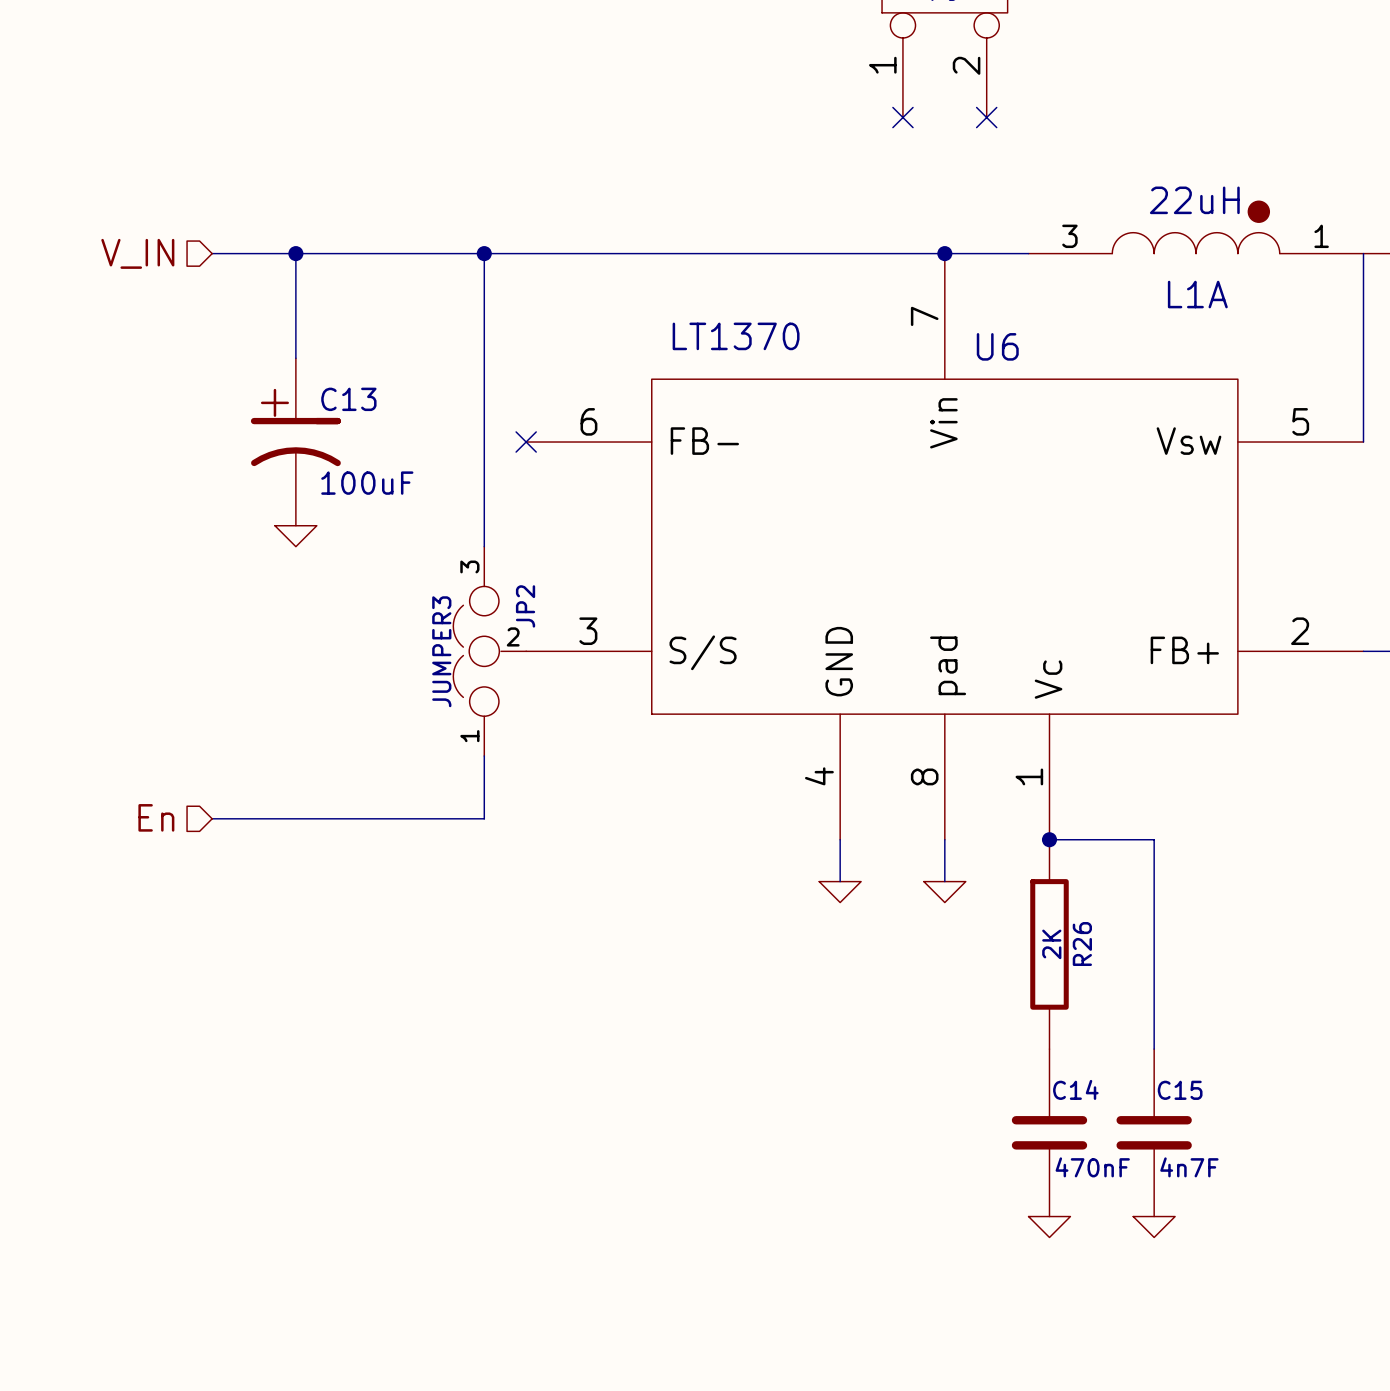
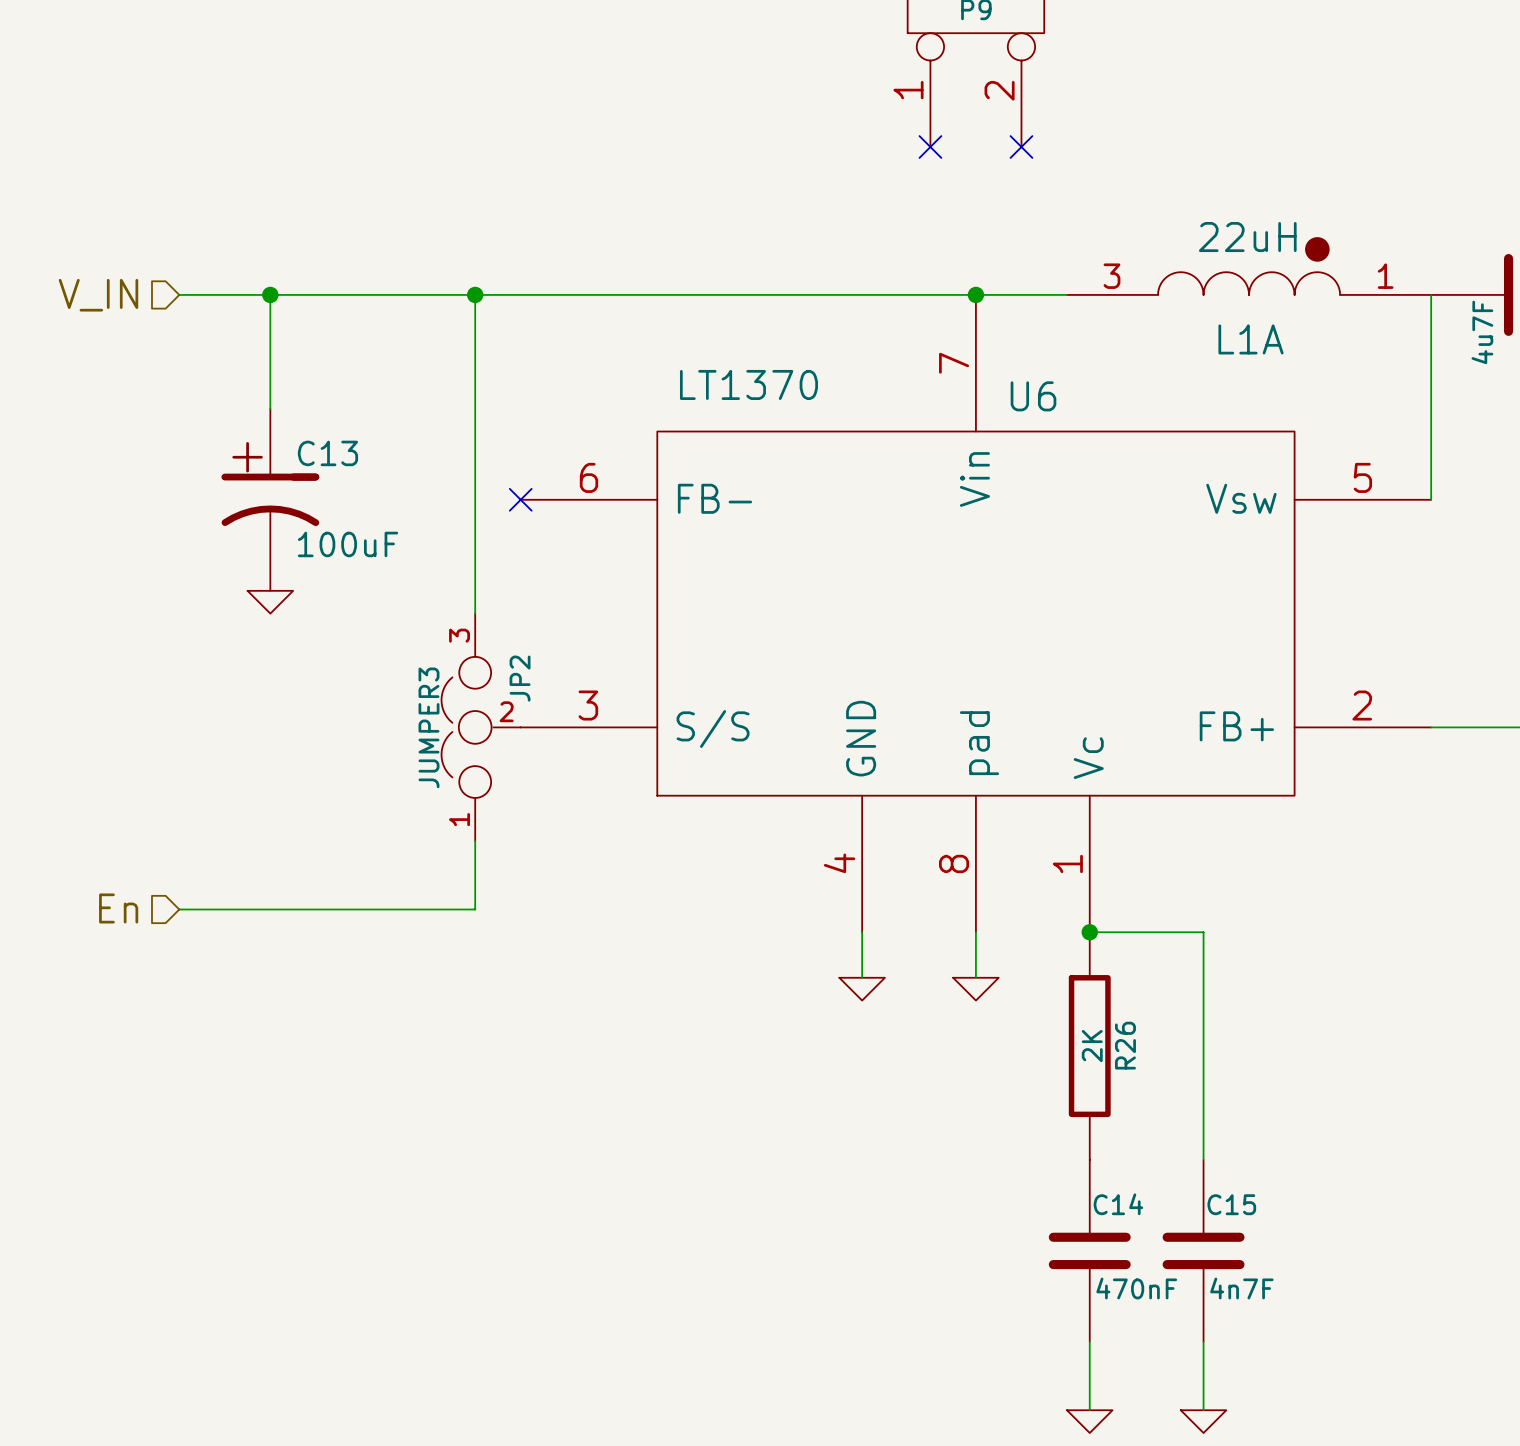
wire: none -> (1089, 1341) (1089, 1410)
wire: none -> (1203, 1341) (1203, 1410)
power symbol: (1049, 1227) -> none
power symbol: (1154, 1227) -> none
power symbol: none -> (1089, 1421)
power symbol: none -> (1203, 1421)

